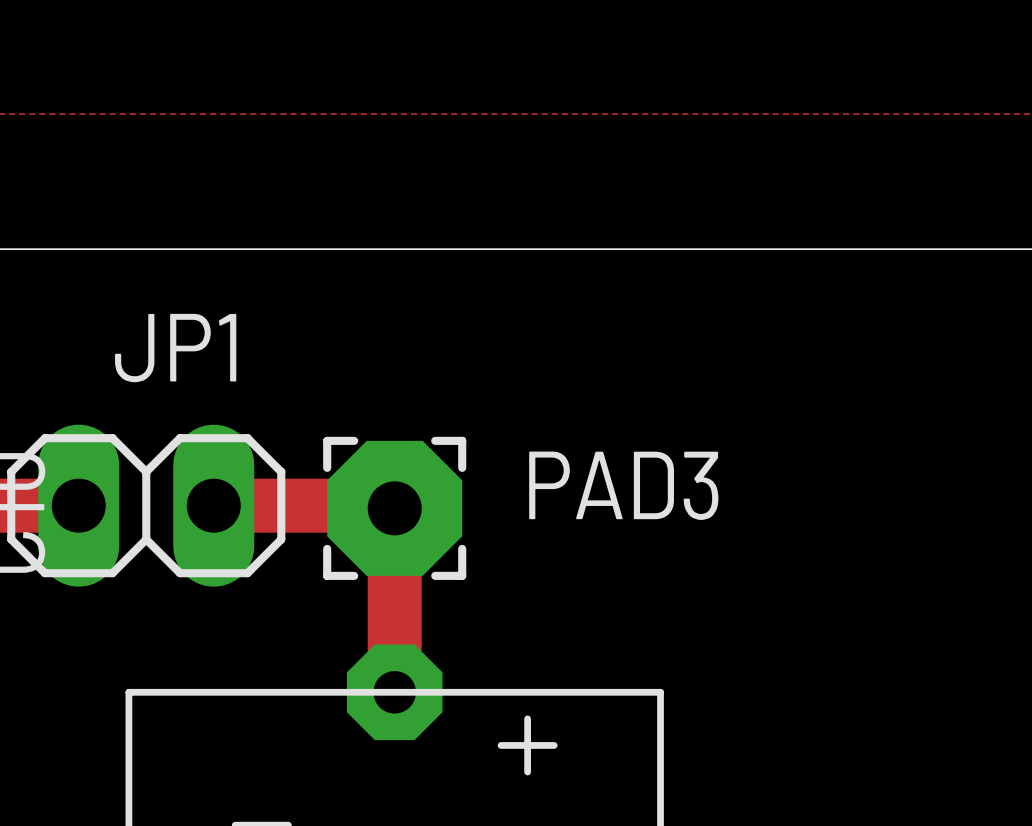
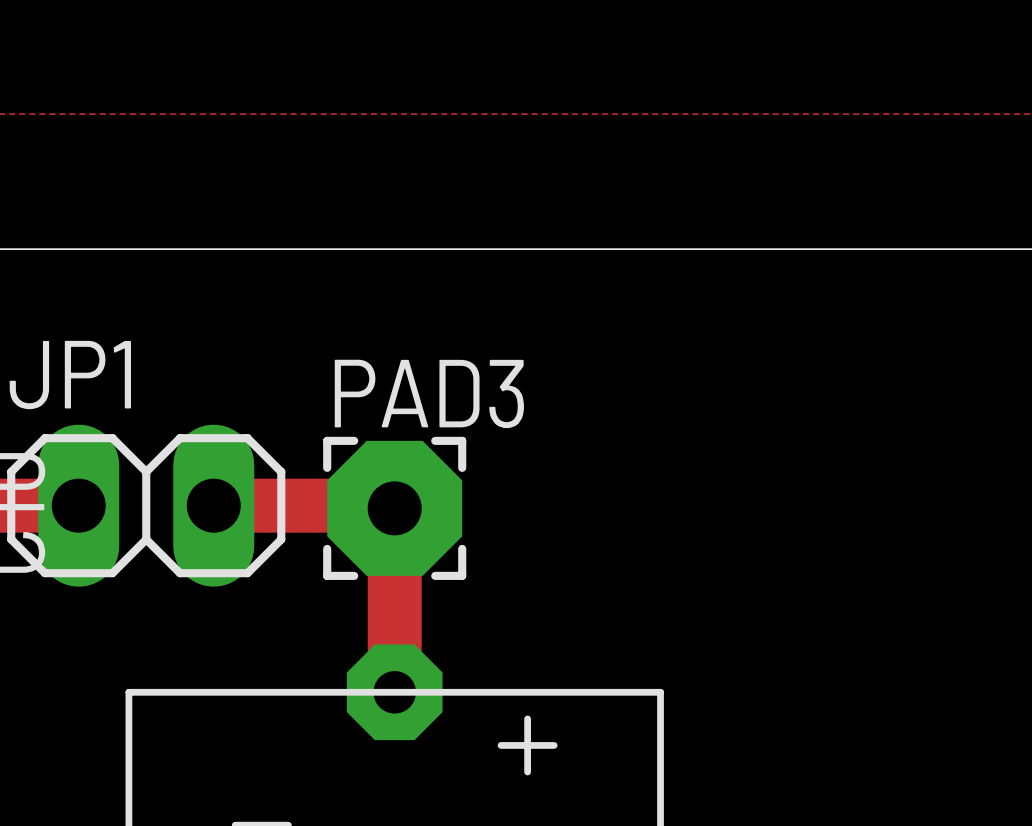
JP1 name position: JP1 (175, 348) -> JP1 (70, 375)
PAD3 name position: PAD3 (623, 485) -> PAD3 (429, 393)

